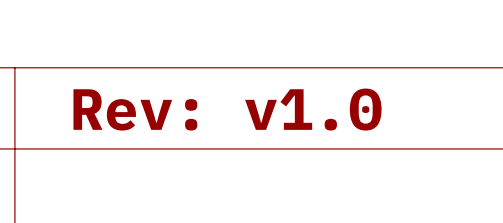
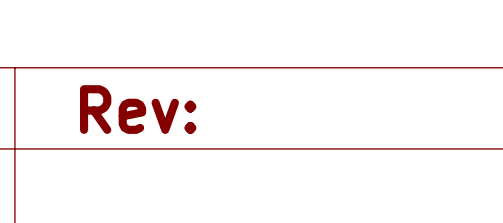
title block: Rev: v1.0 (227, 109) -> Rev: (138, 109)

